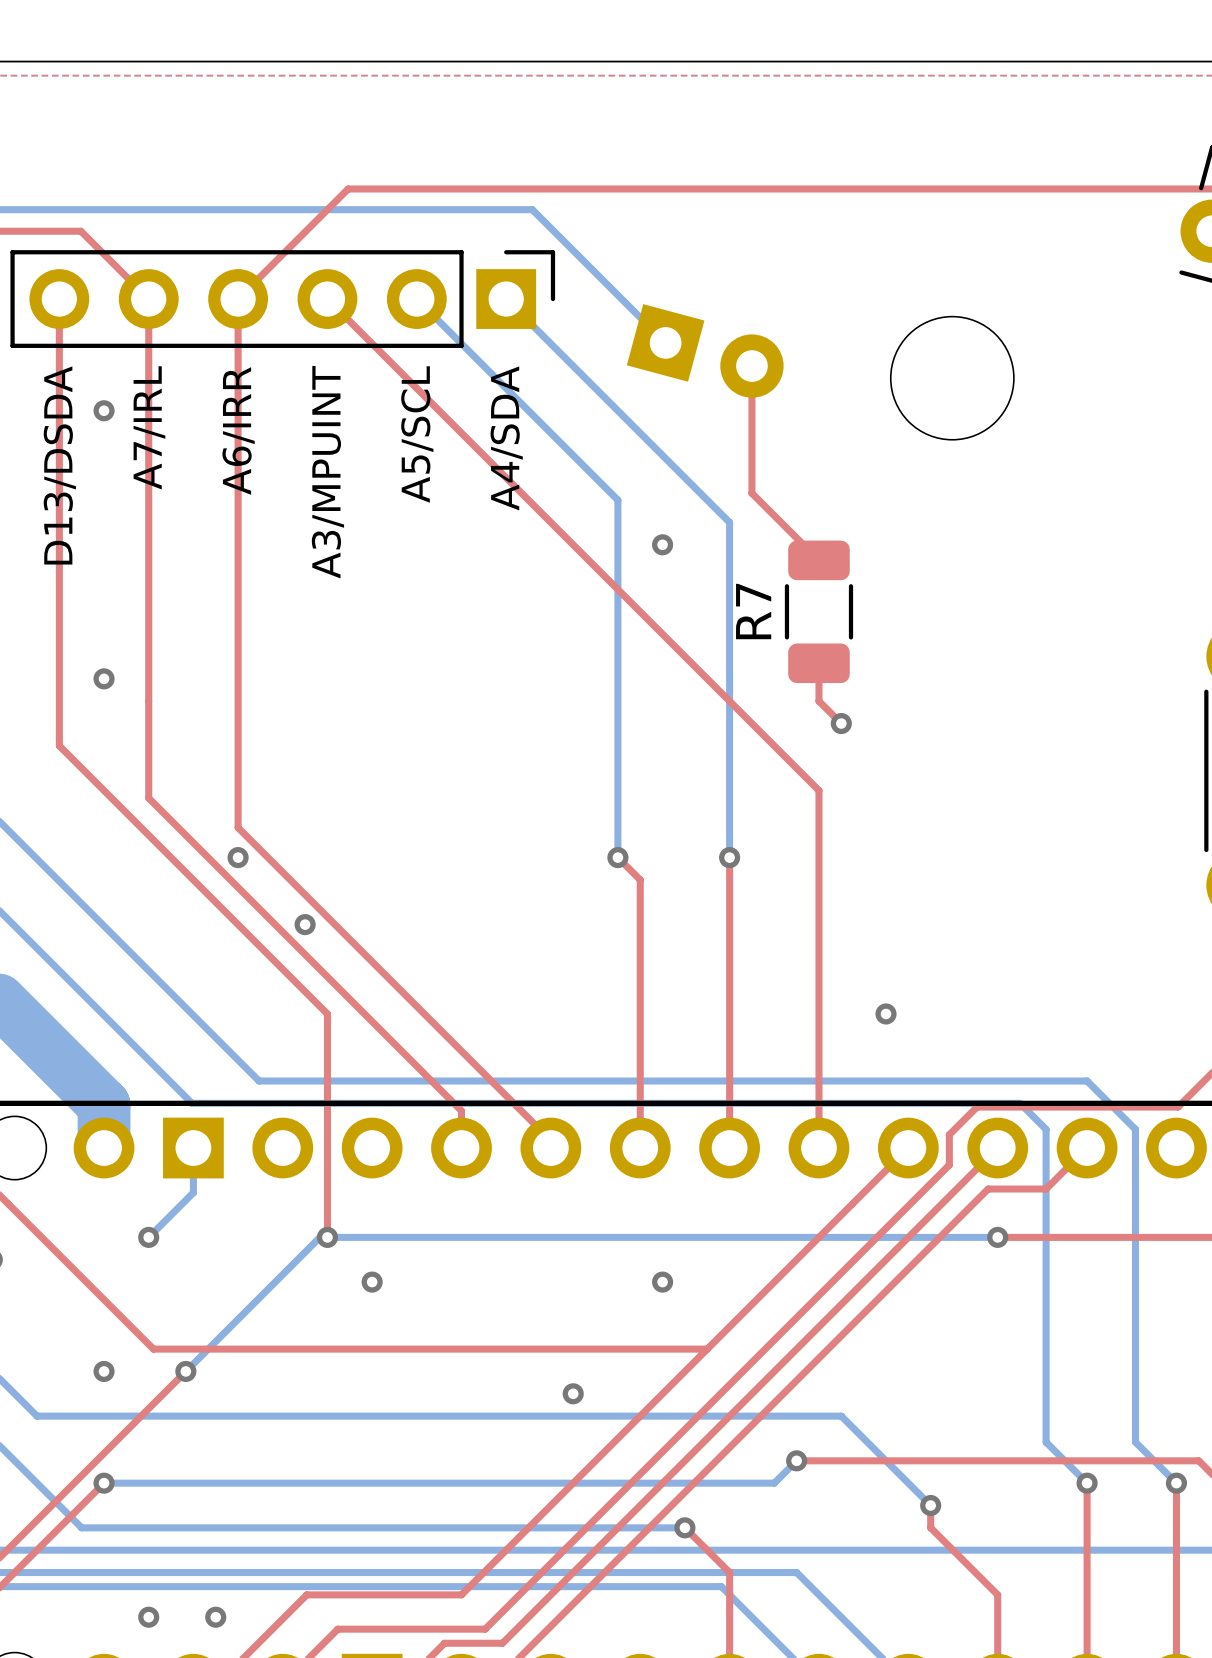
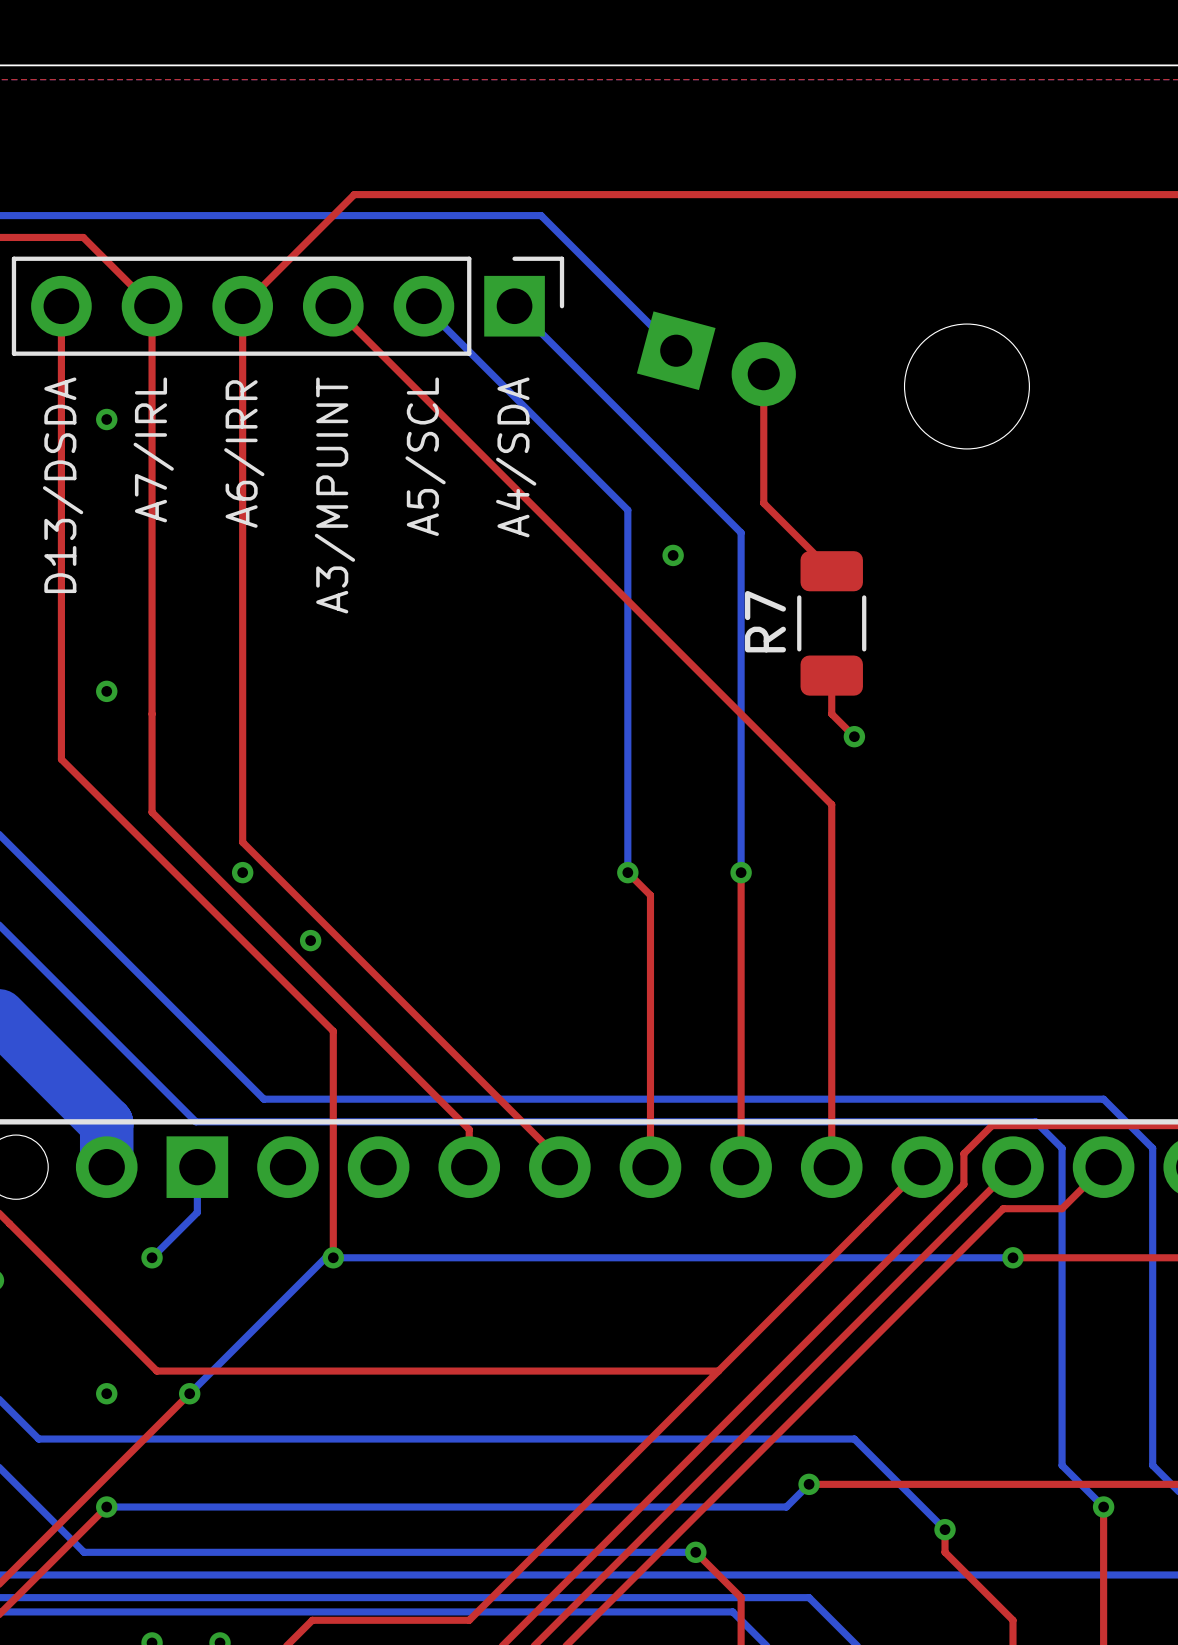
via: (886, 1013) -> none
via: (372, 1282) -> none
via: (662, 1282) -> none
via: (573, 1393) -> none

